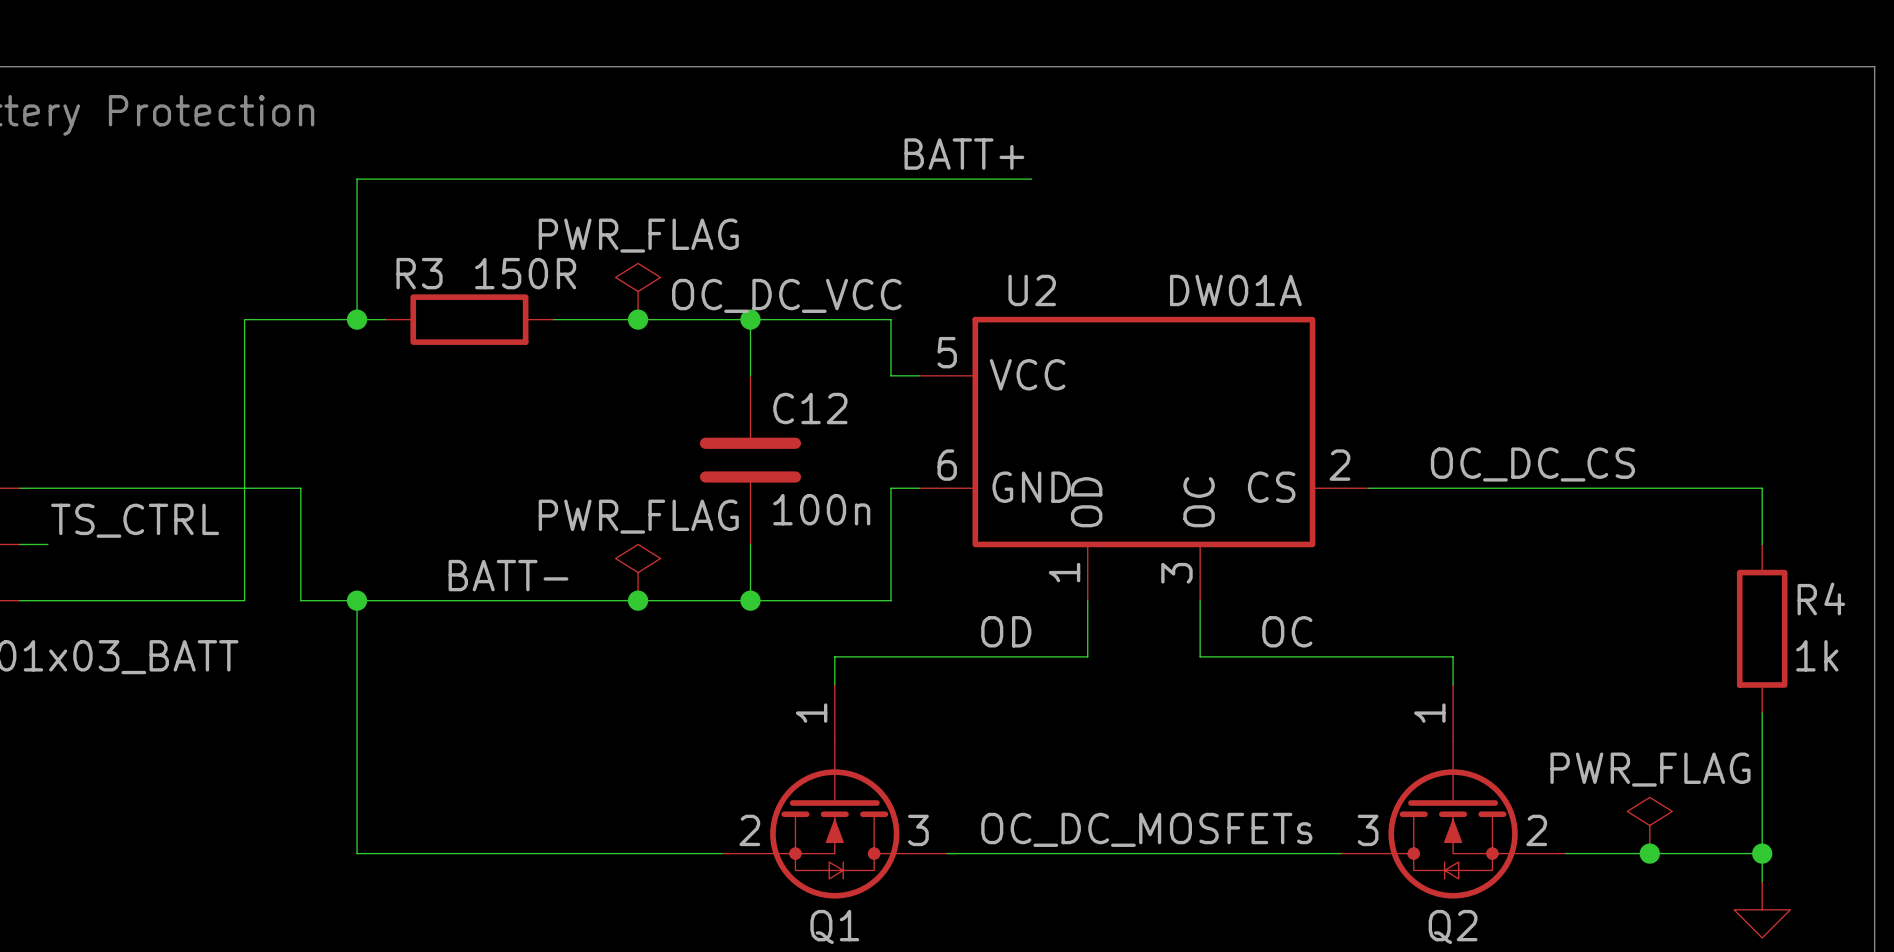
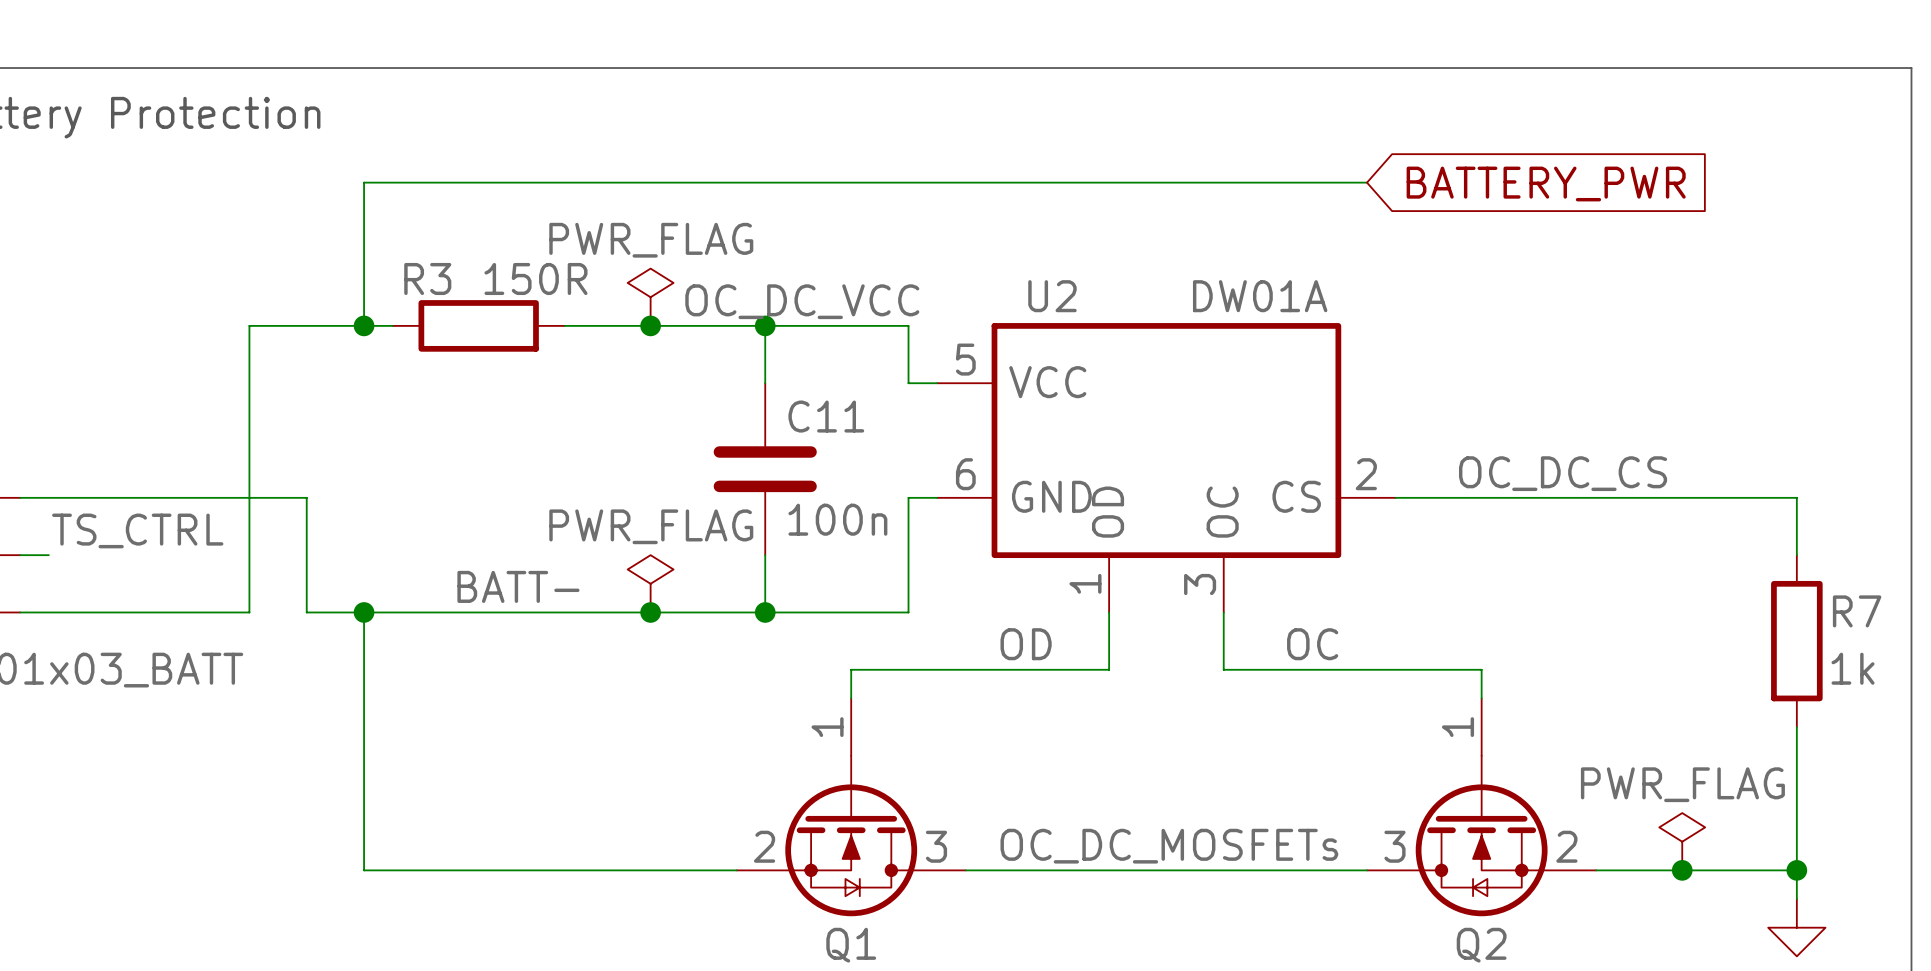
label: BATT+ (964, 154) -> none
wire: none -> (1051, 182) (1367, 182)
global label: none -> BATTERY_PWR (1546, 183)
C12 name: C12 (810, 408) -> C11 (826, 416)
R4 name: R4 (1821, 598) -> R7 (1857, 611)

